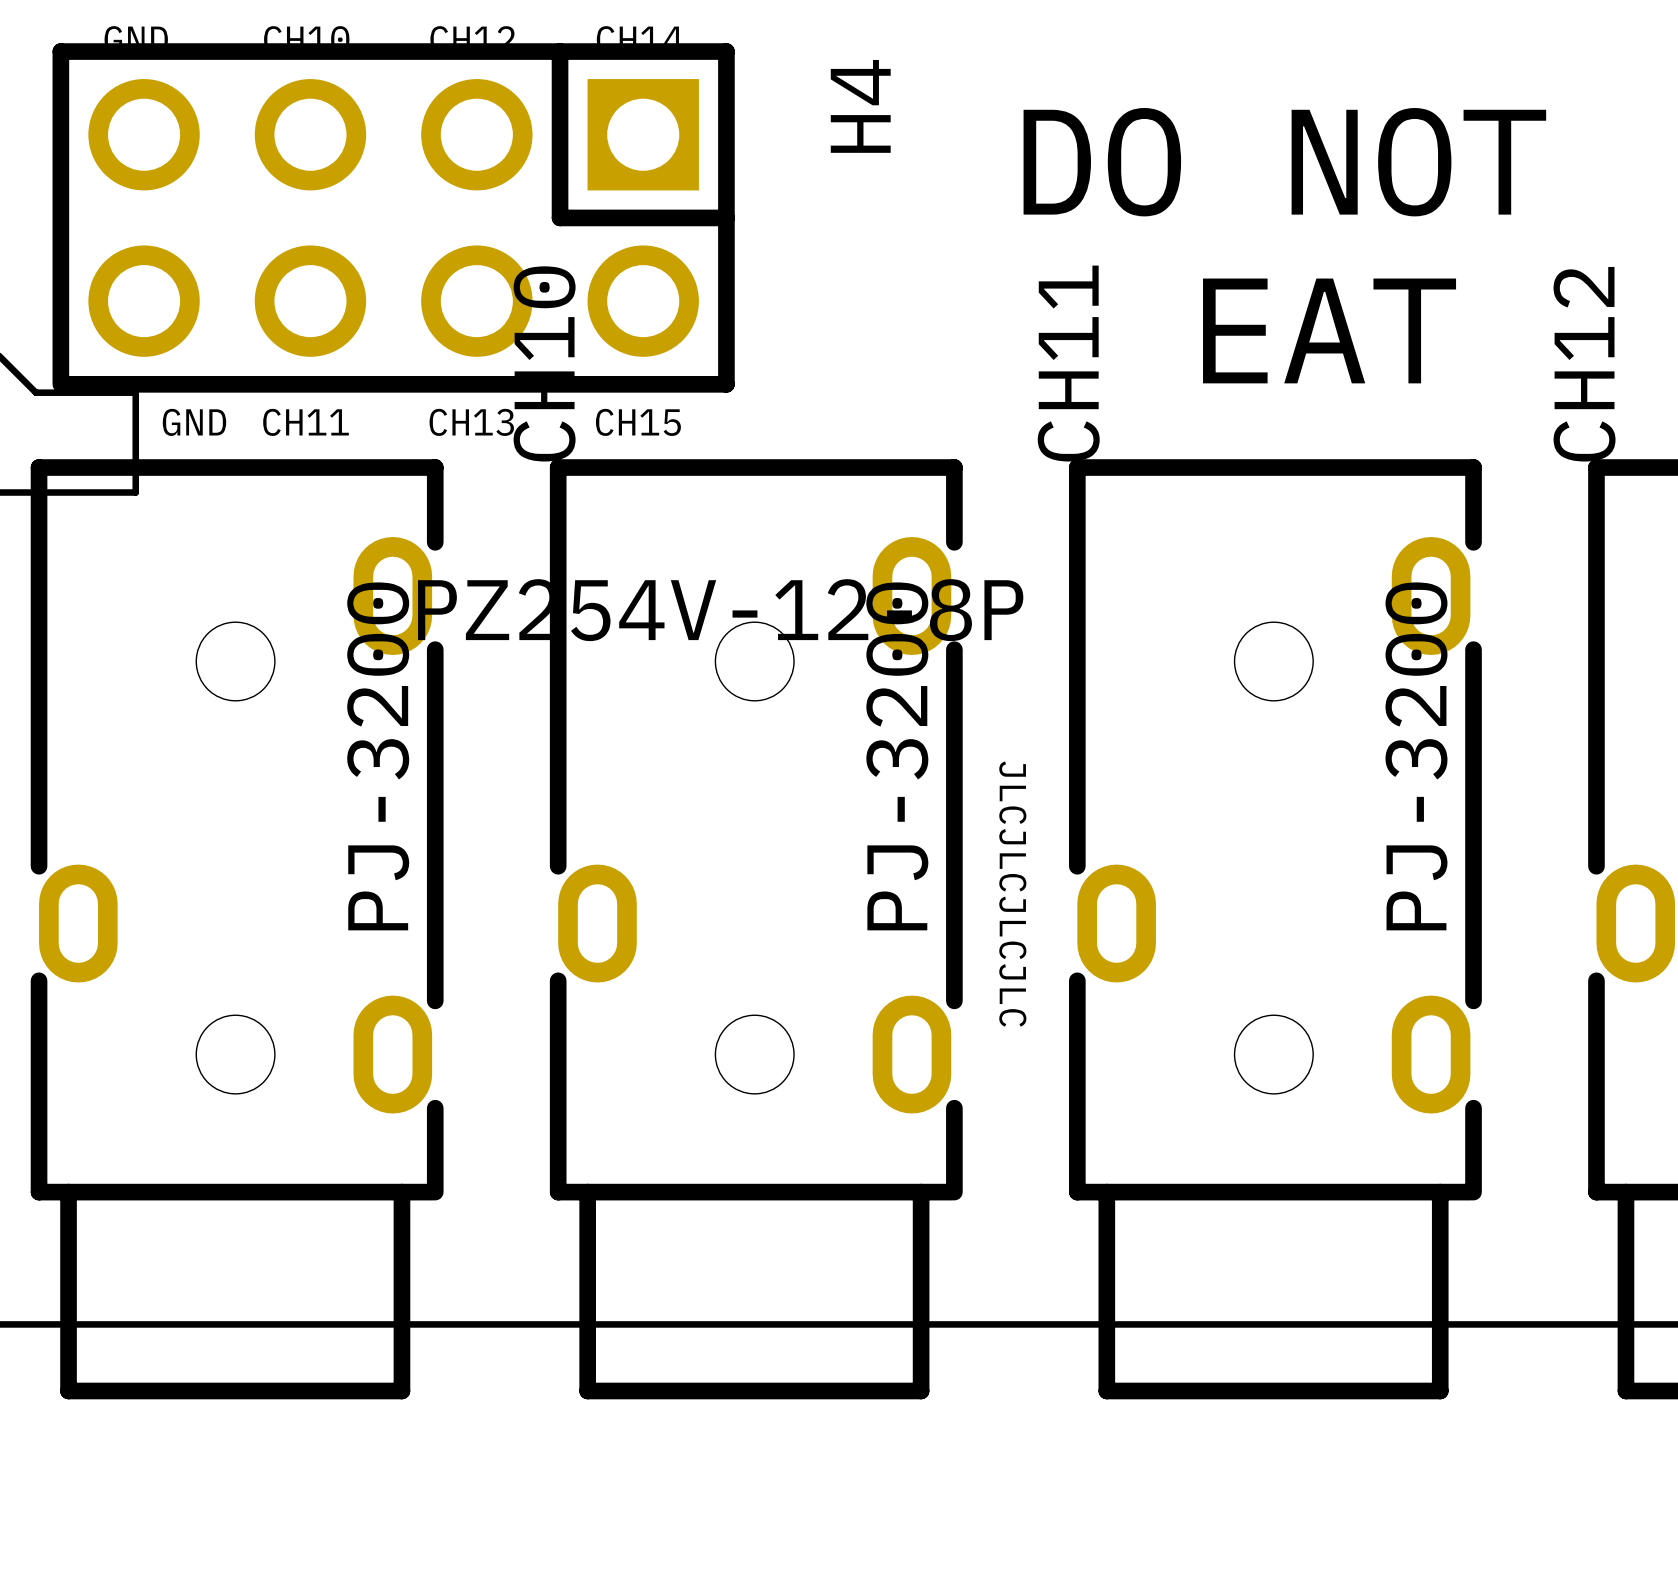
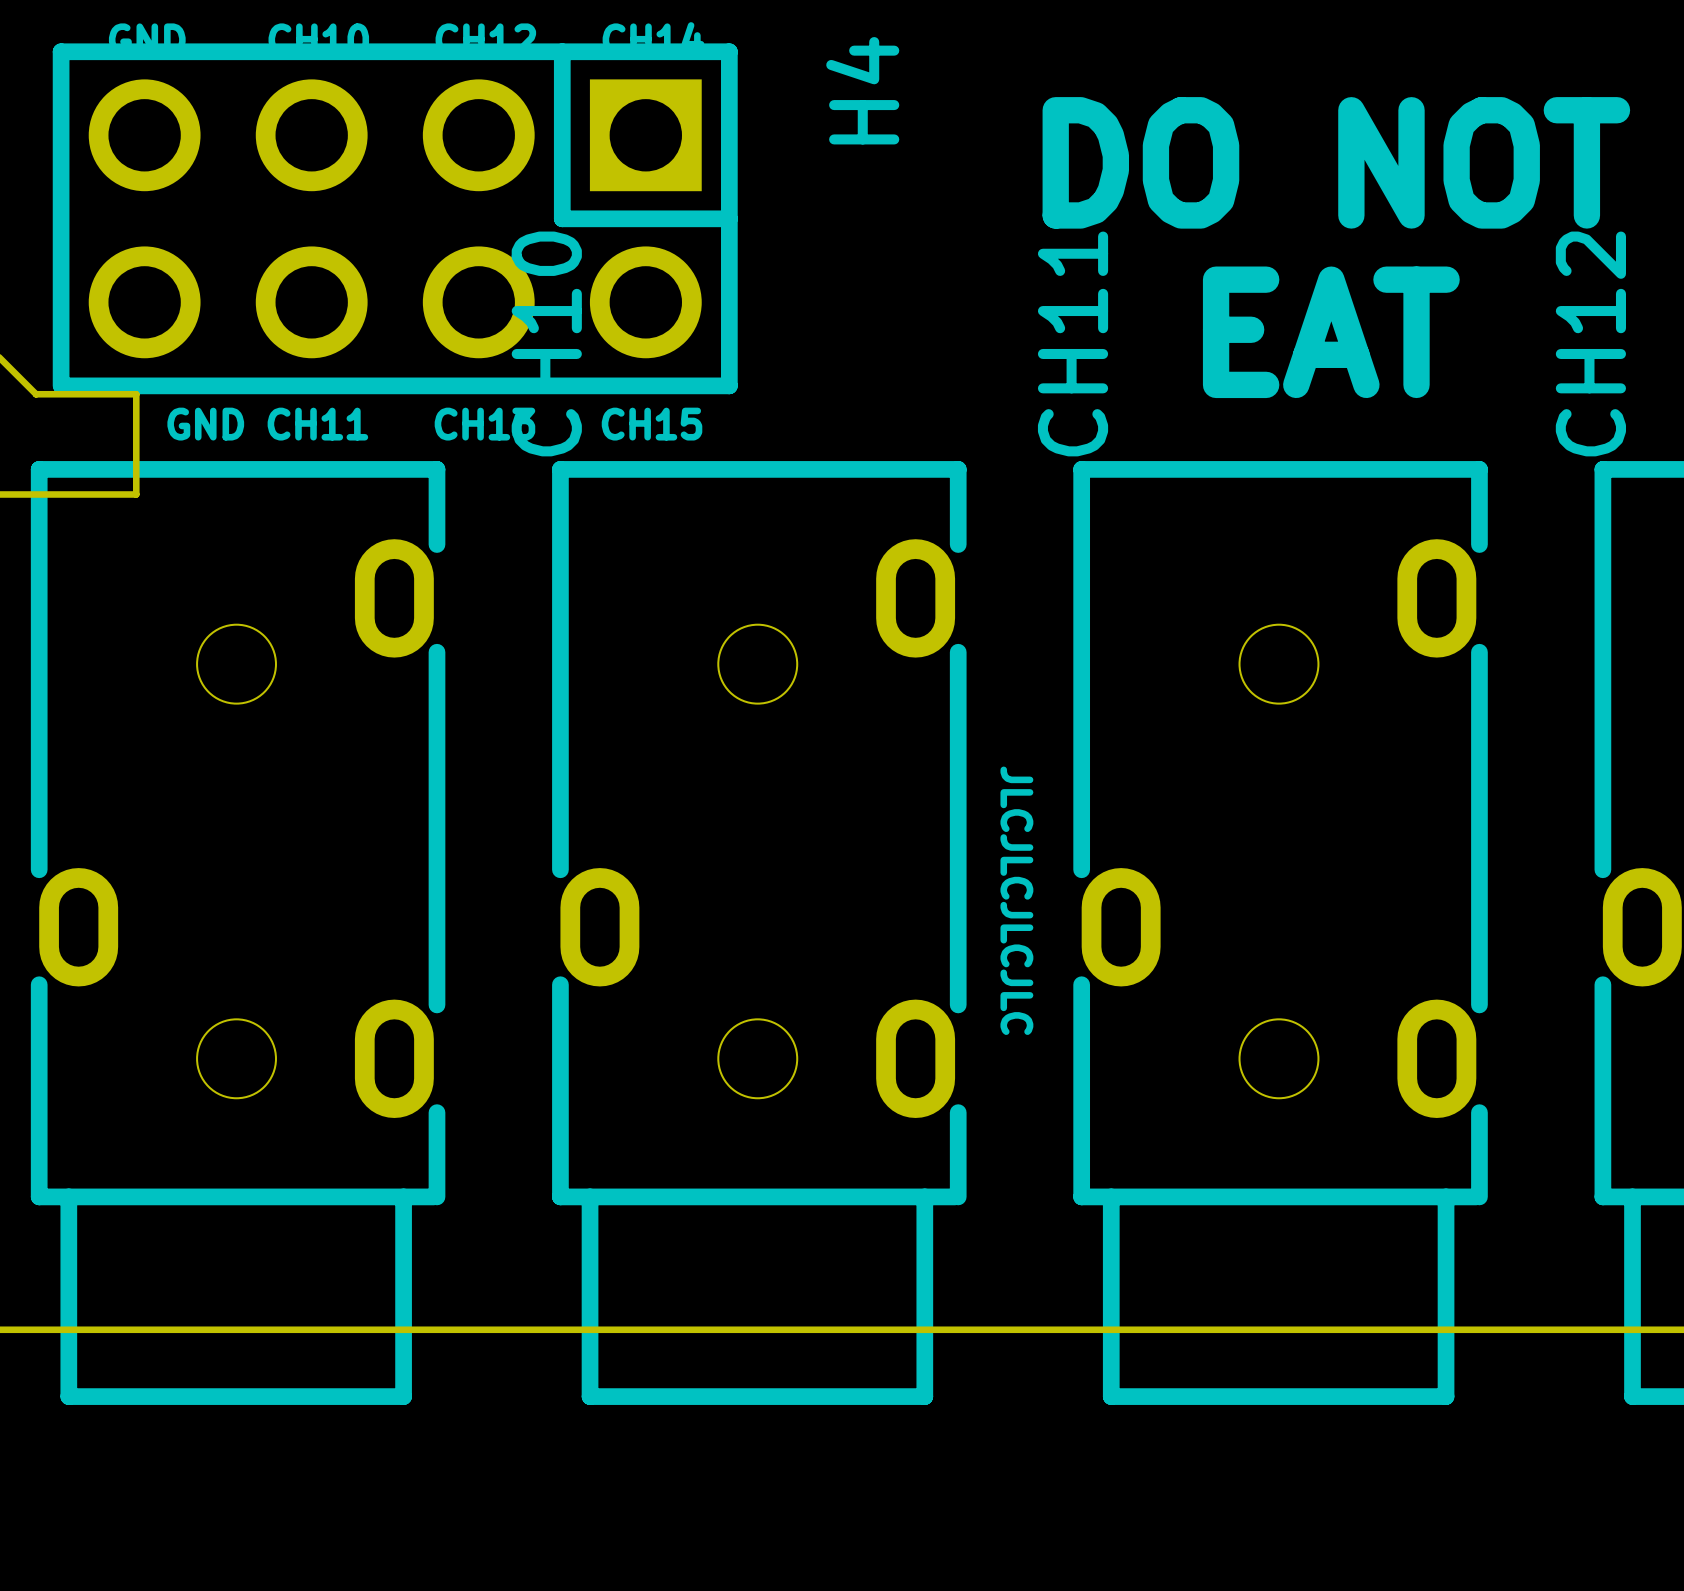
H4 value: PZ254V-12-8P (720, 610) -> none
CH11 value: PJ-3200 (378, 756) -> none
CH12 value: PJ-3200 (897, 756) -> none
part value: PJ-3200 (1416, 756) -> none

